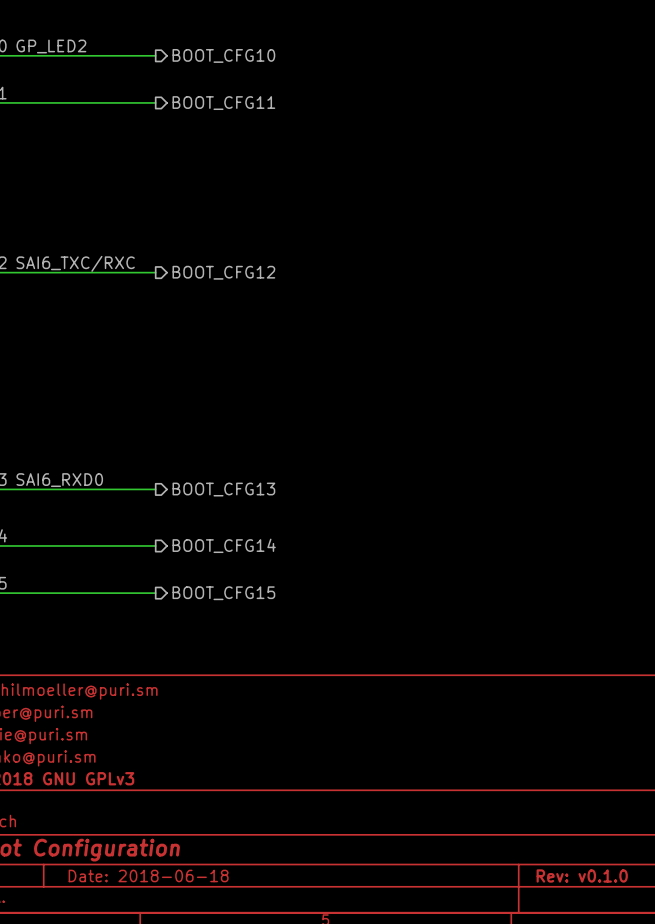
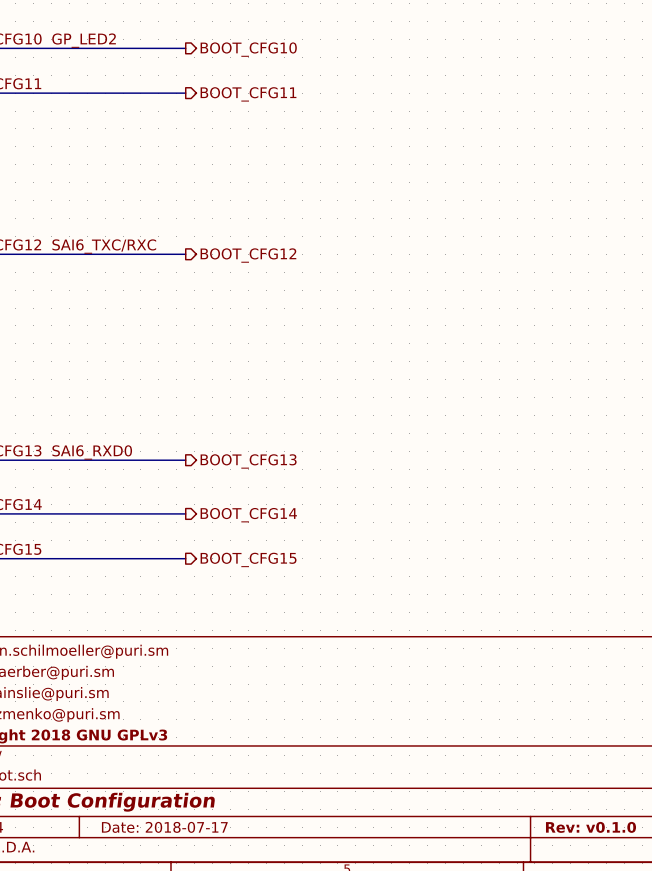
title block: Date: 2018-06-18 (148, 875) -> Date: 2018-07-17 (164, 827)

